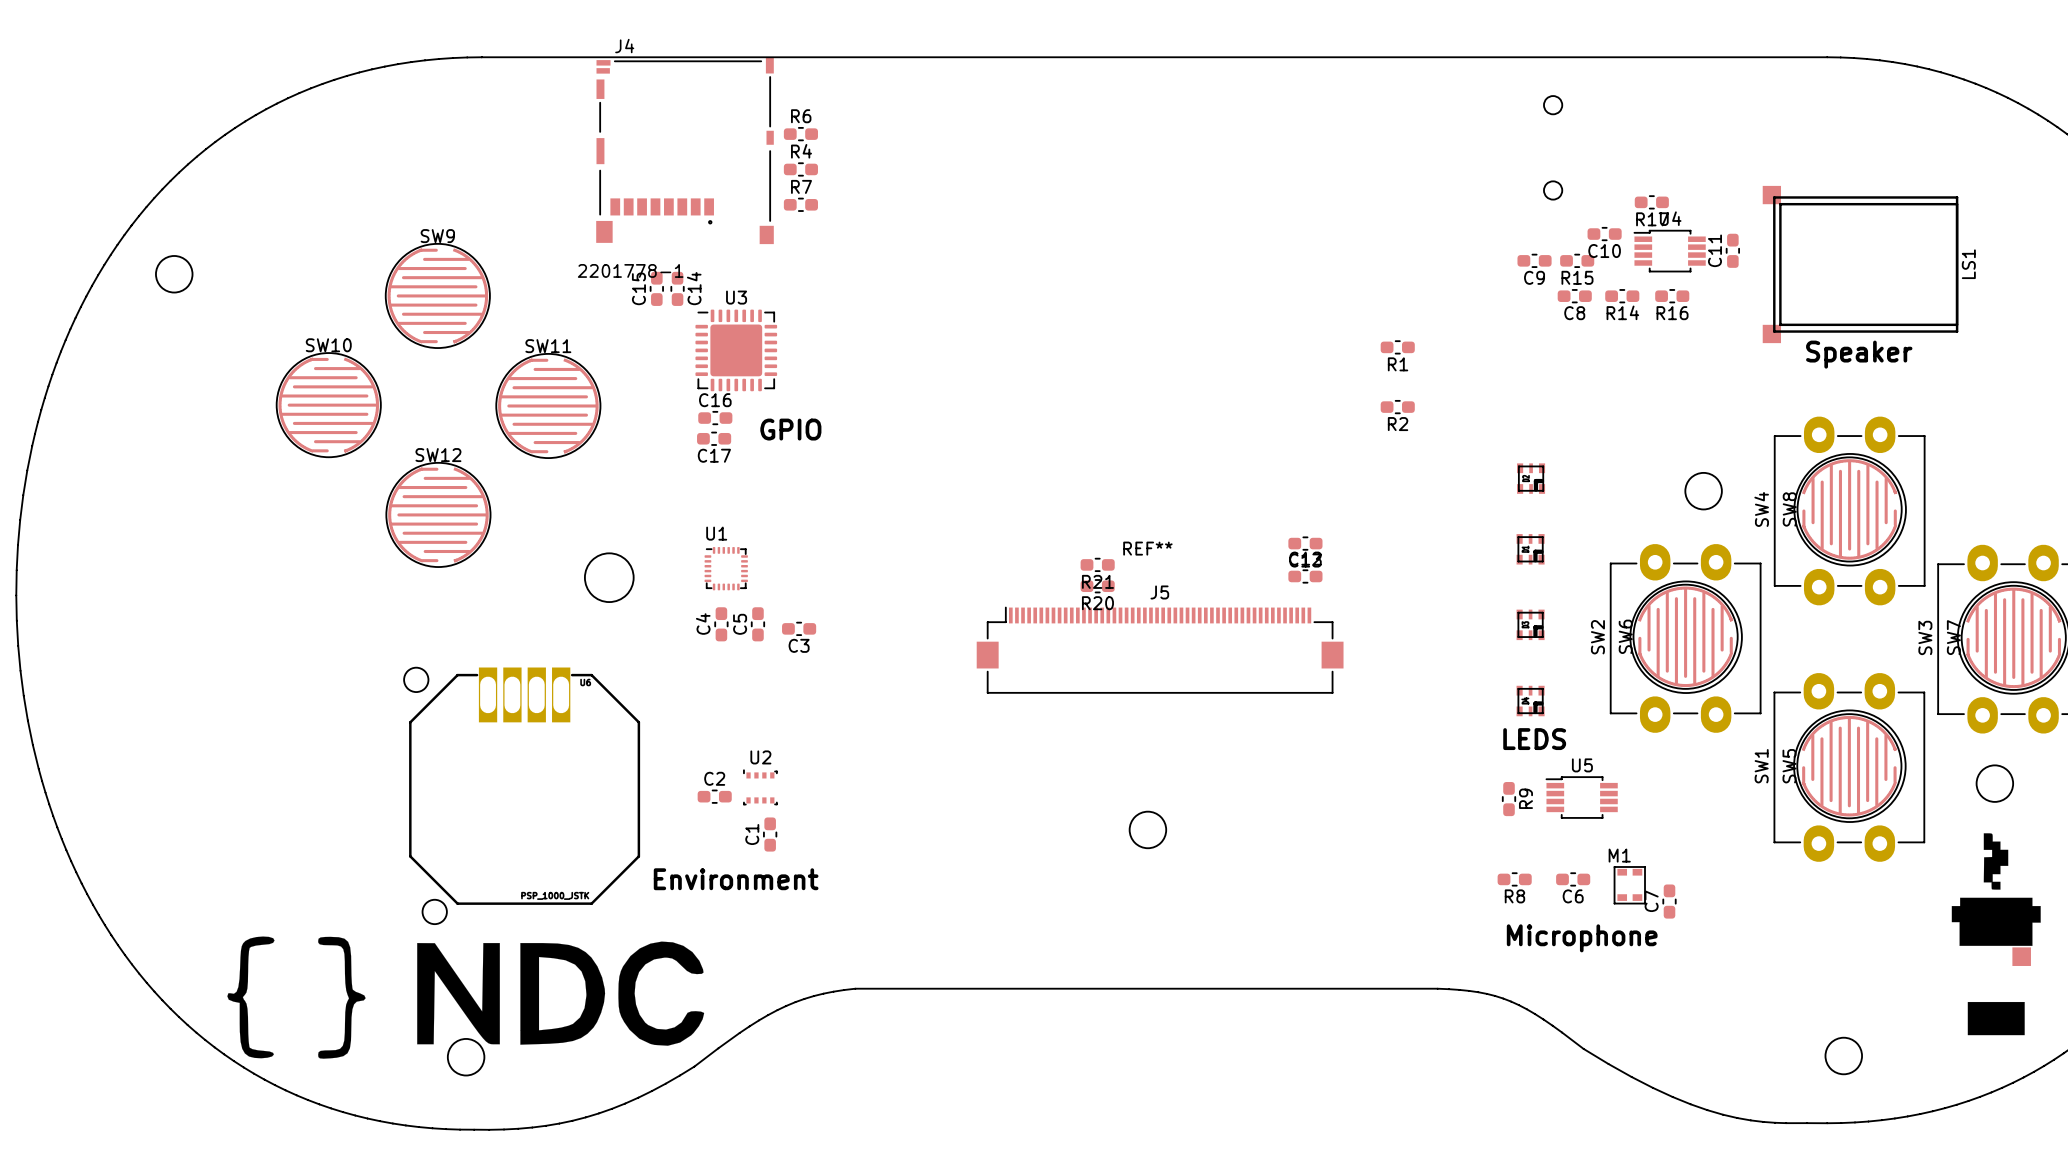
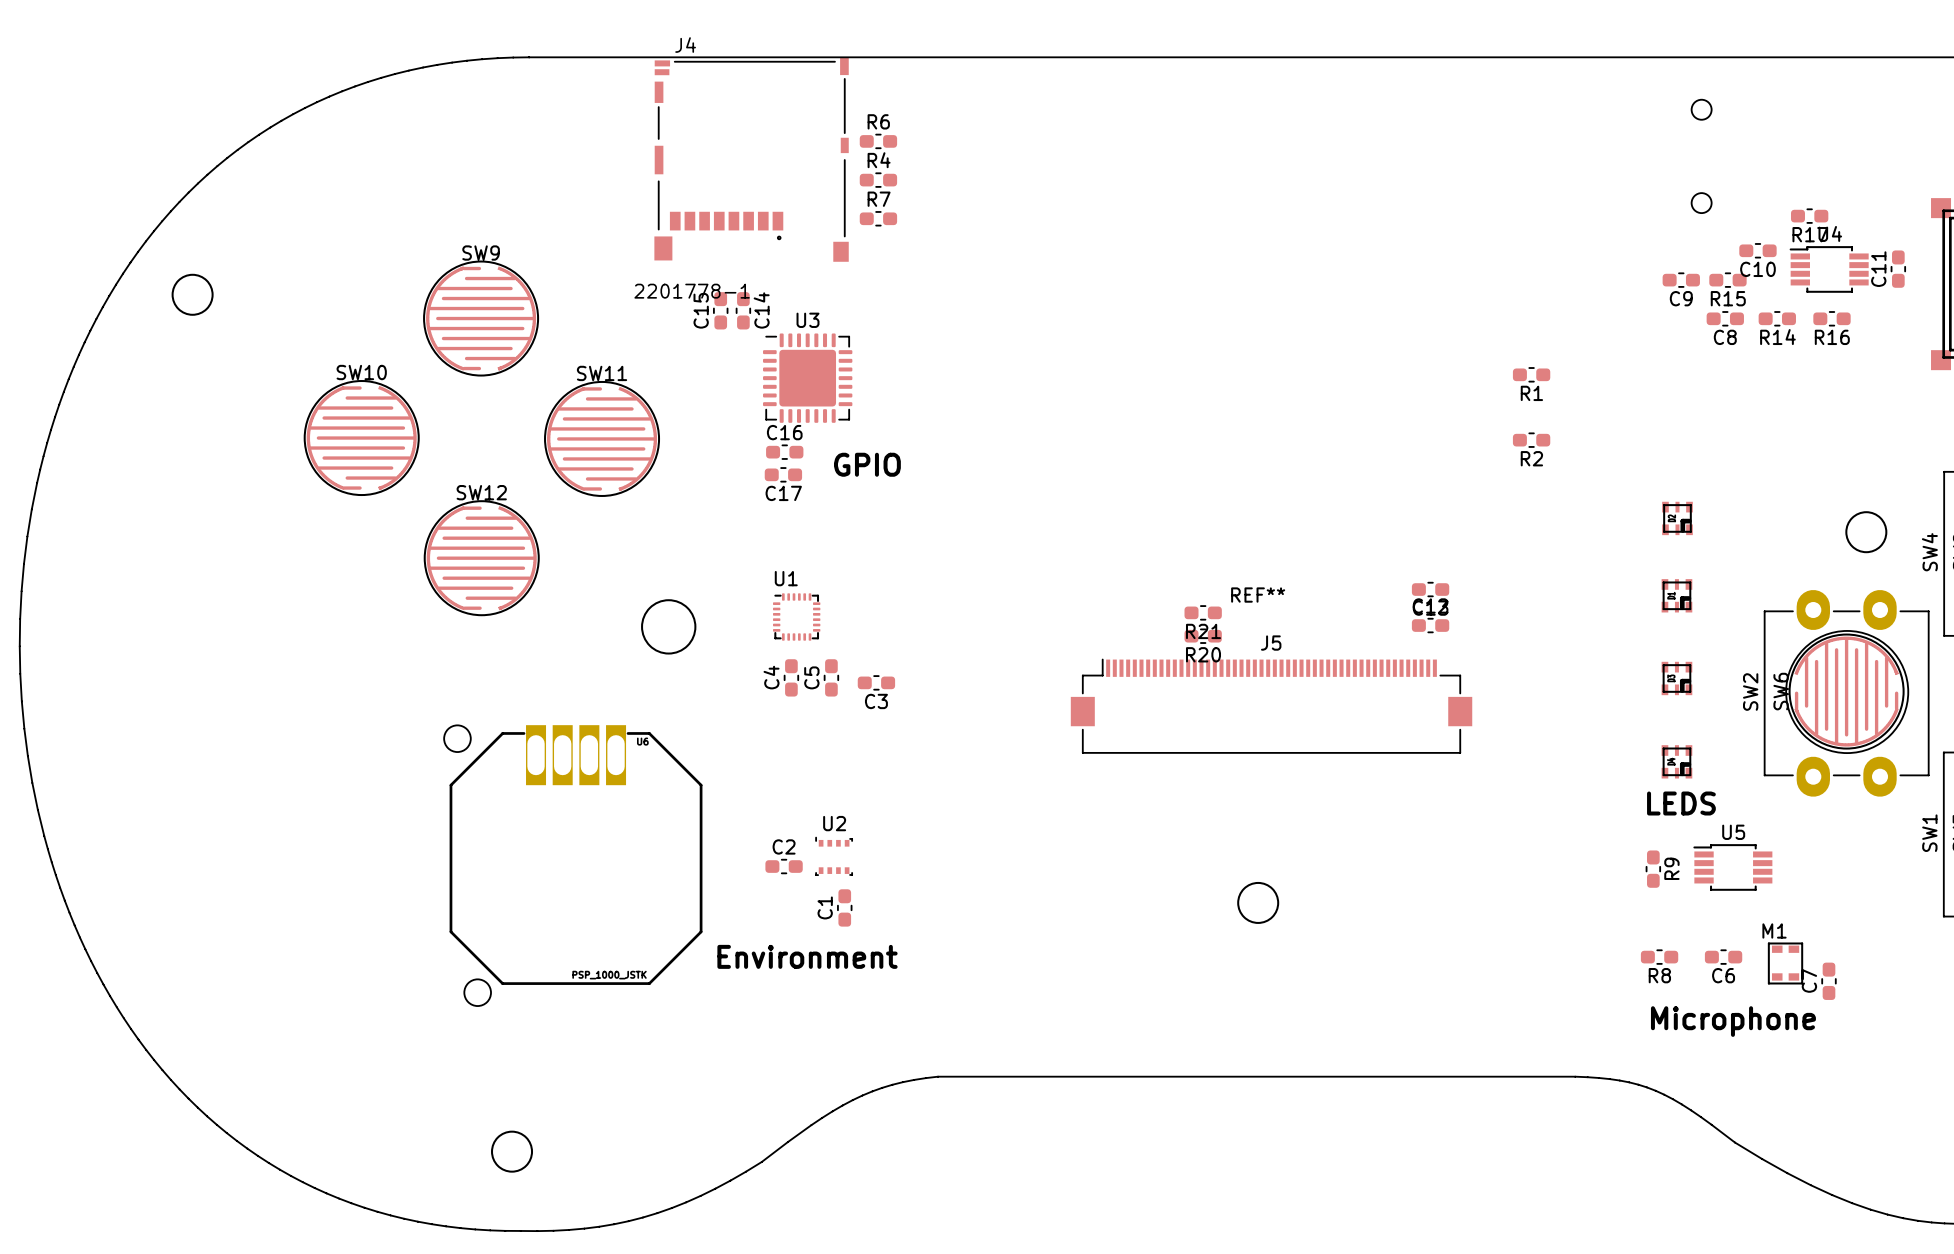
drawing: [227, 936, 705, 1059] -> none

